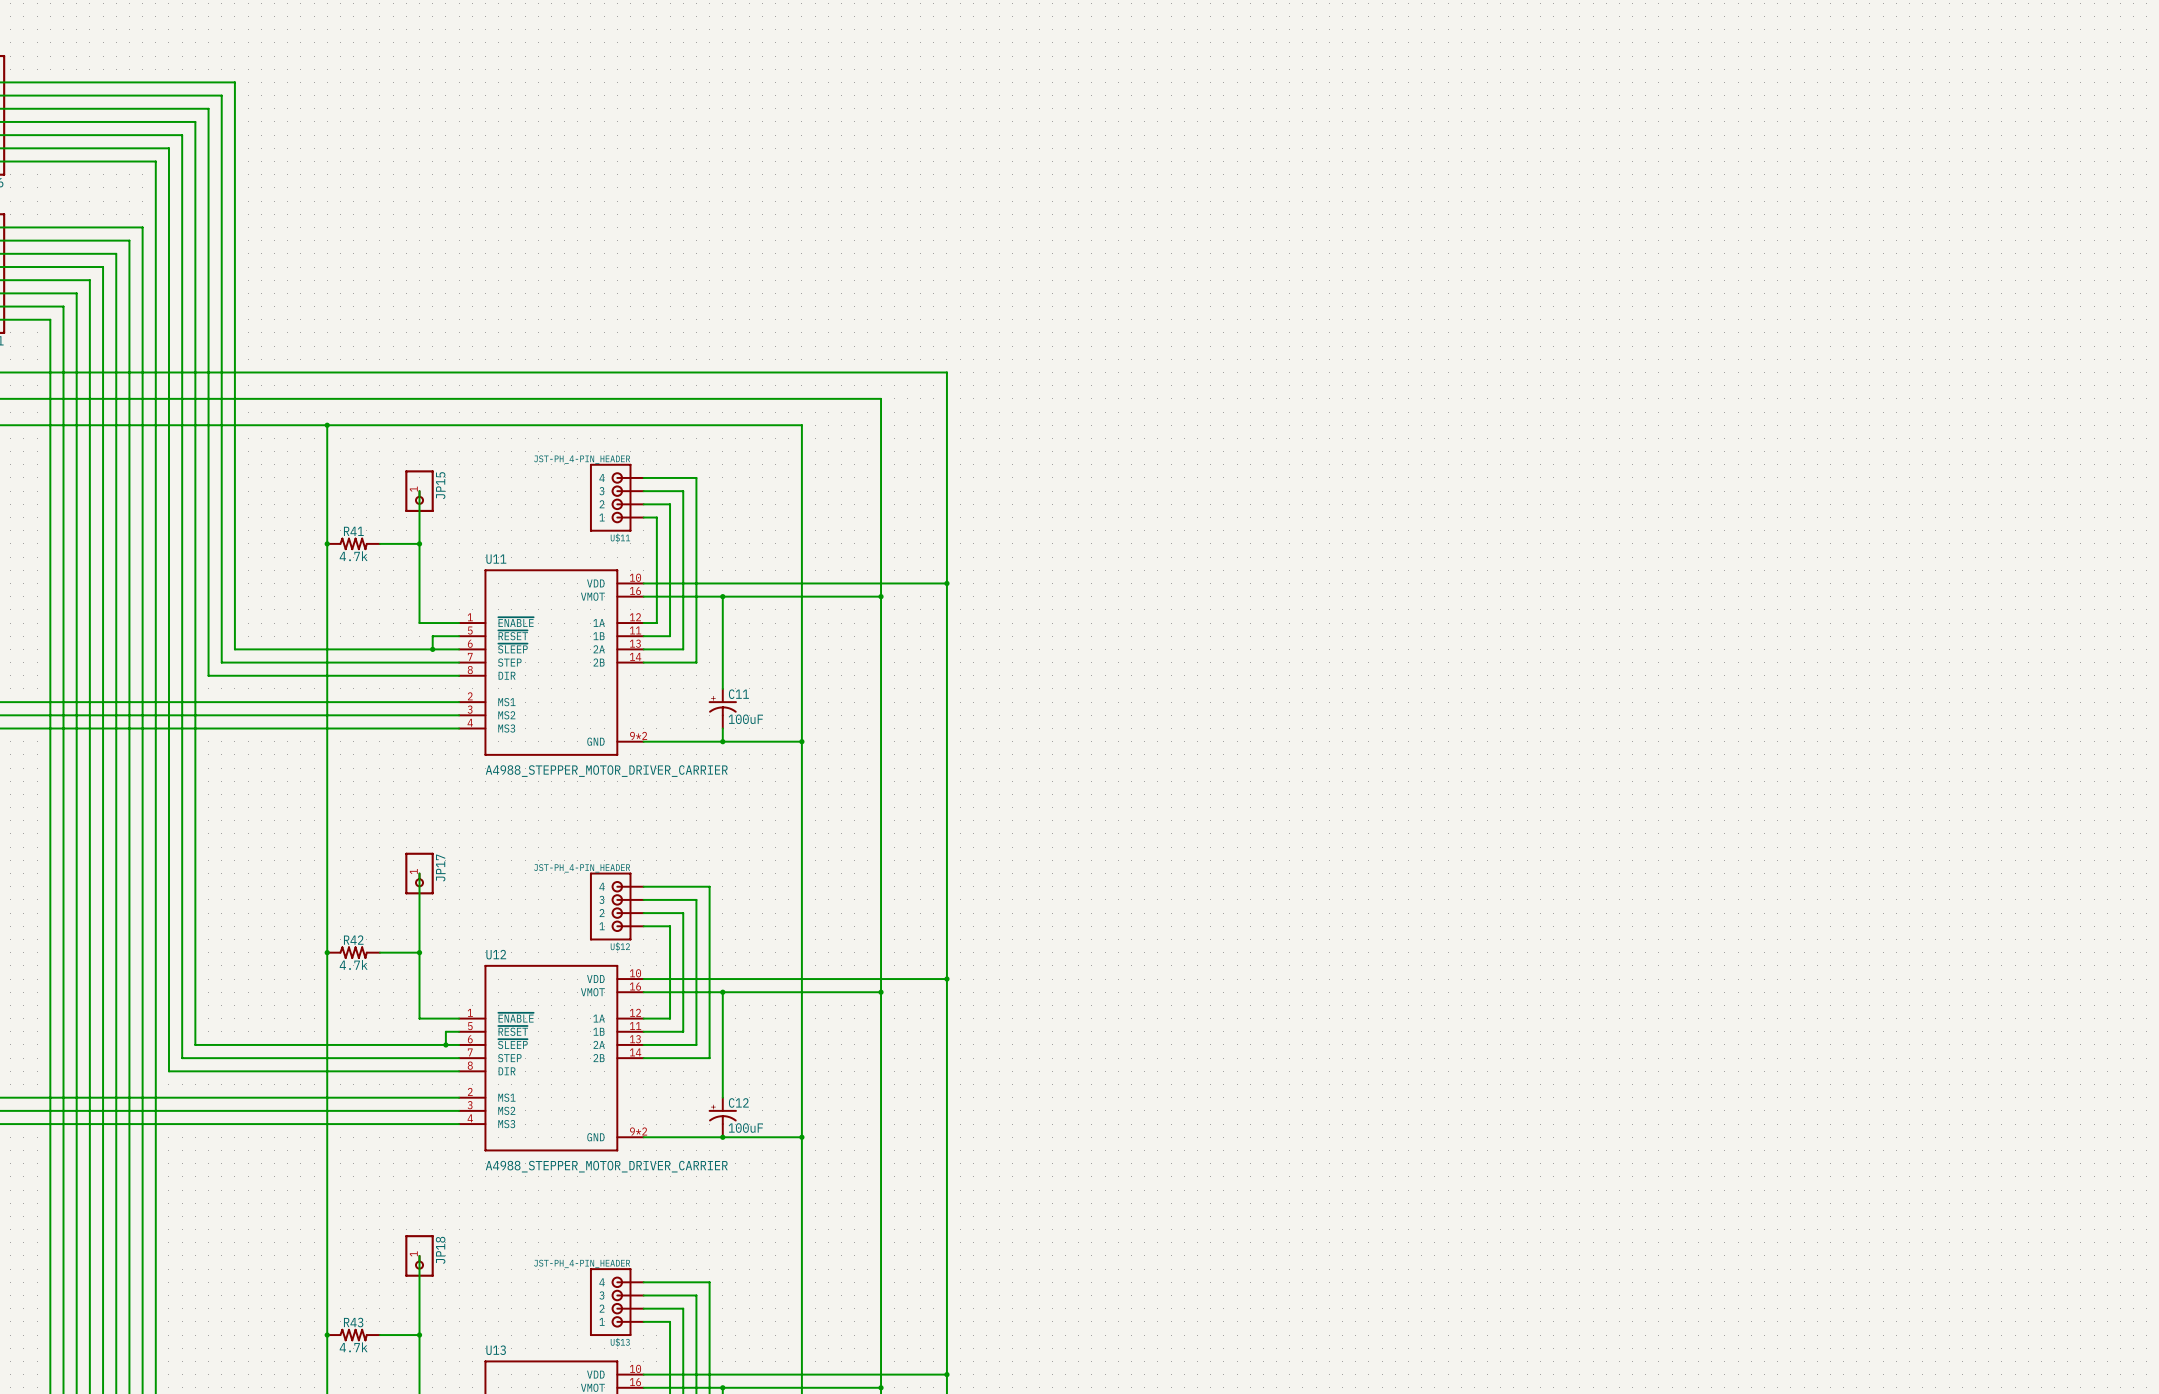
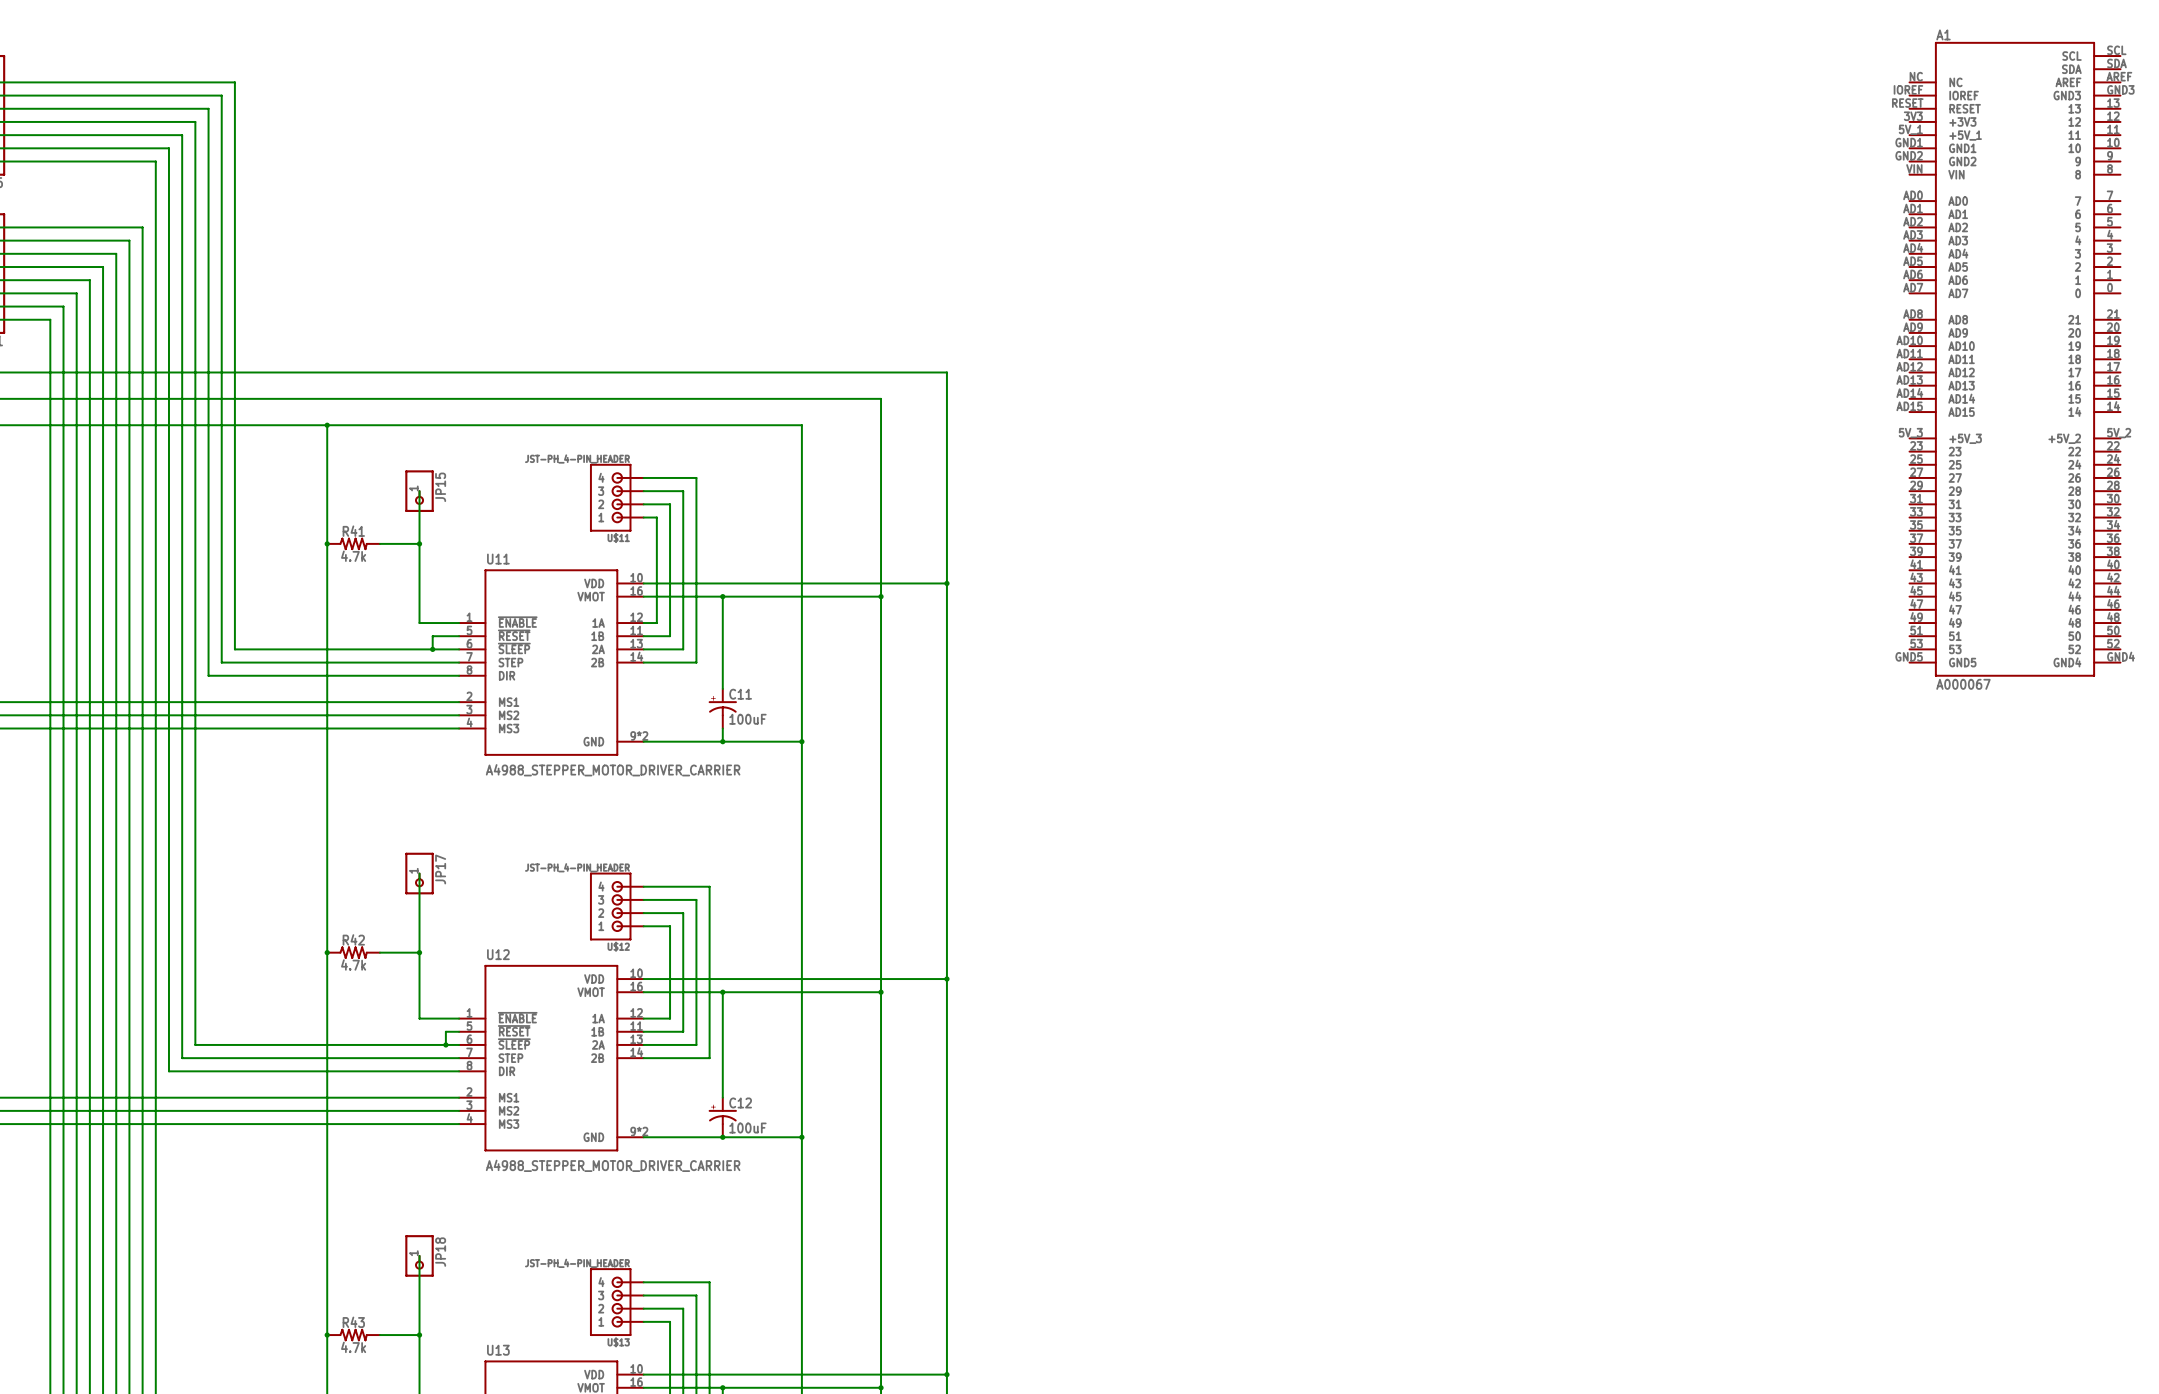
A1: none -> A000067 (2015, 359)

